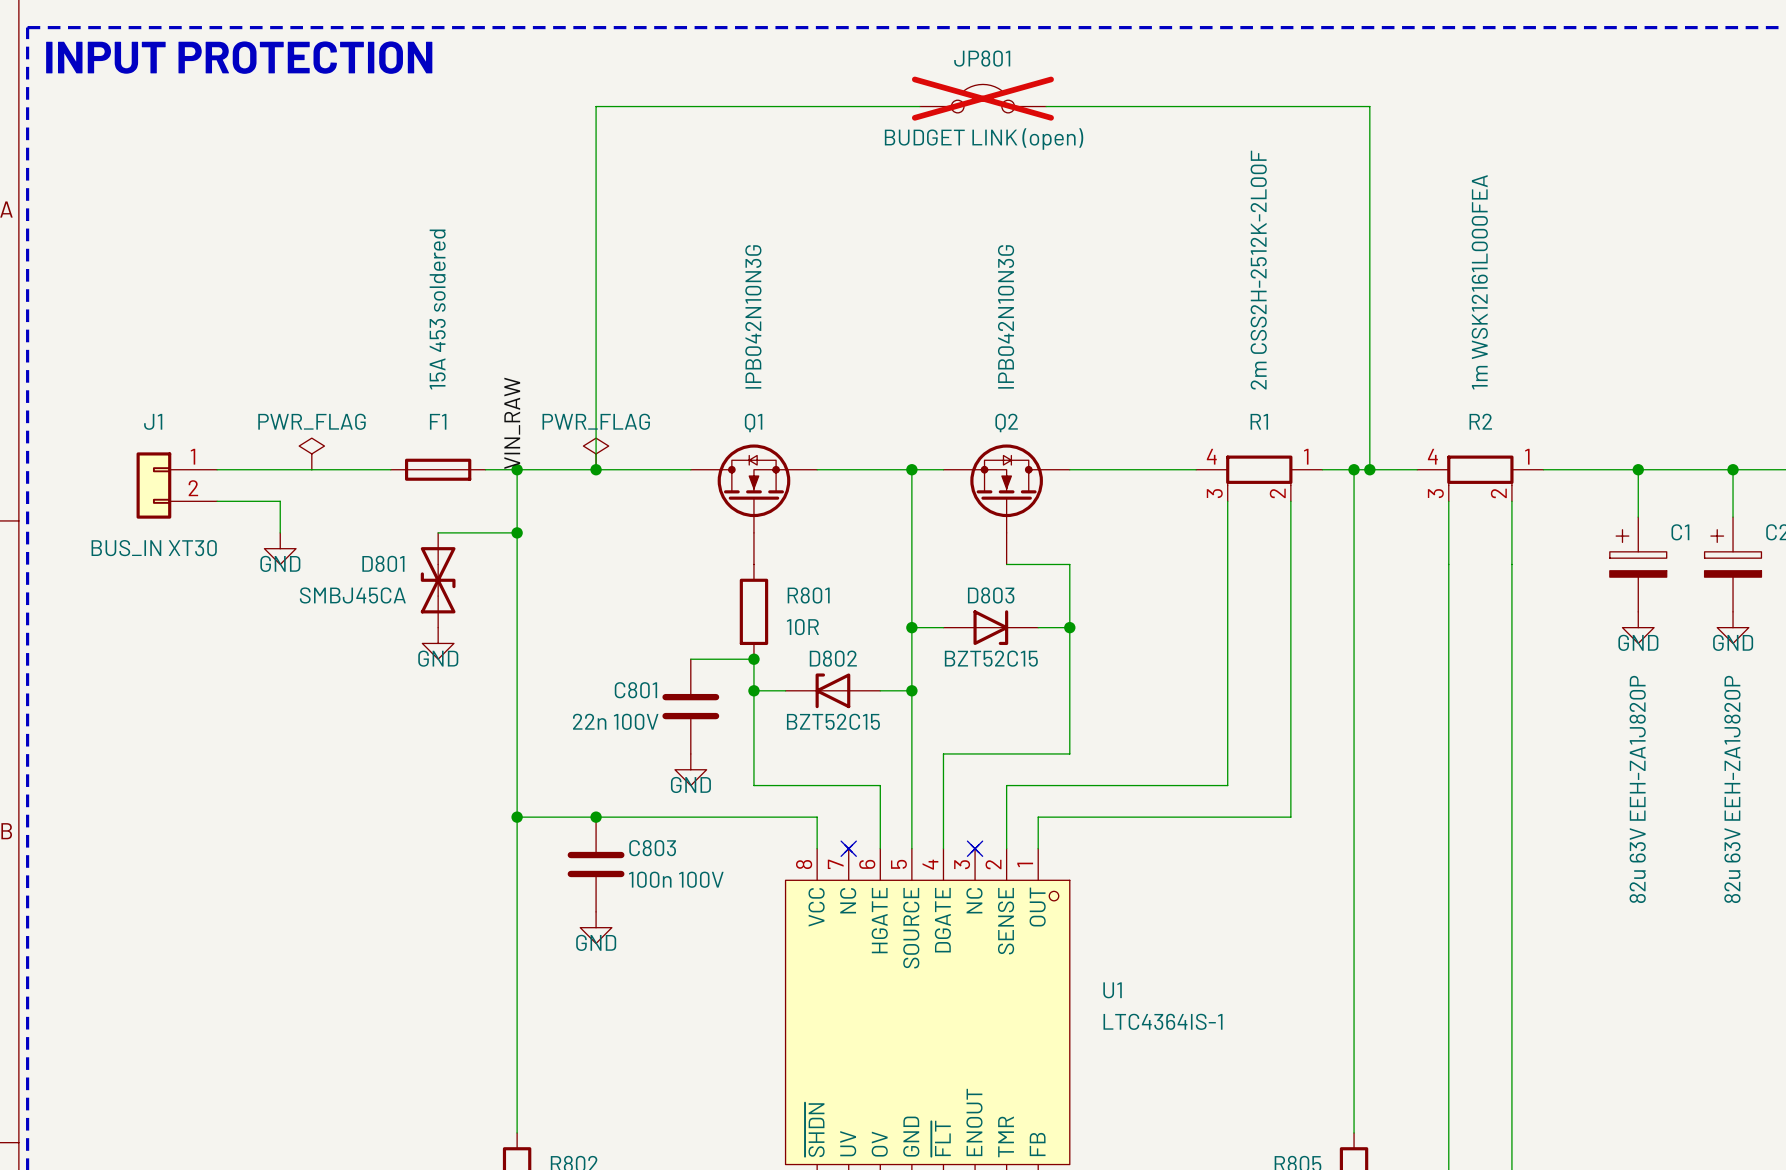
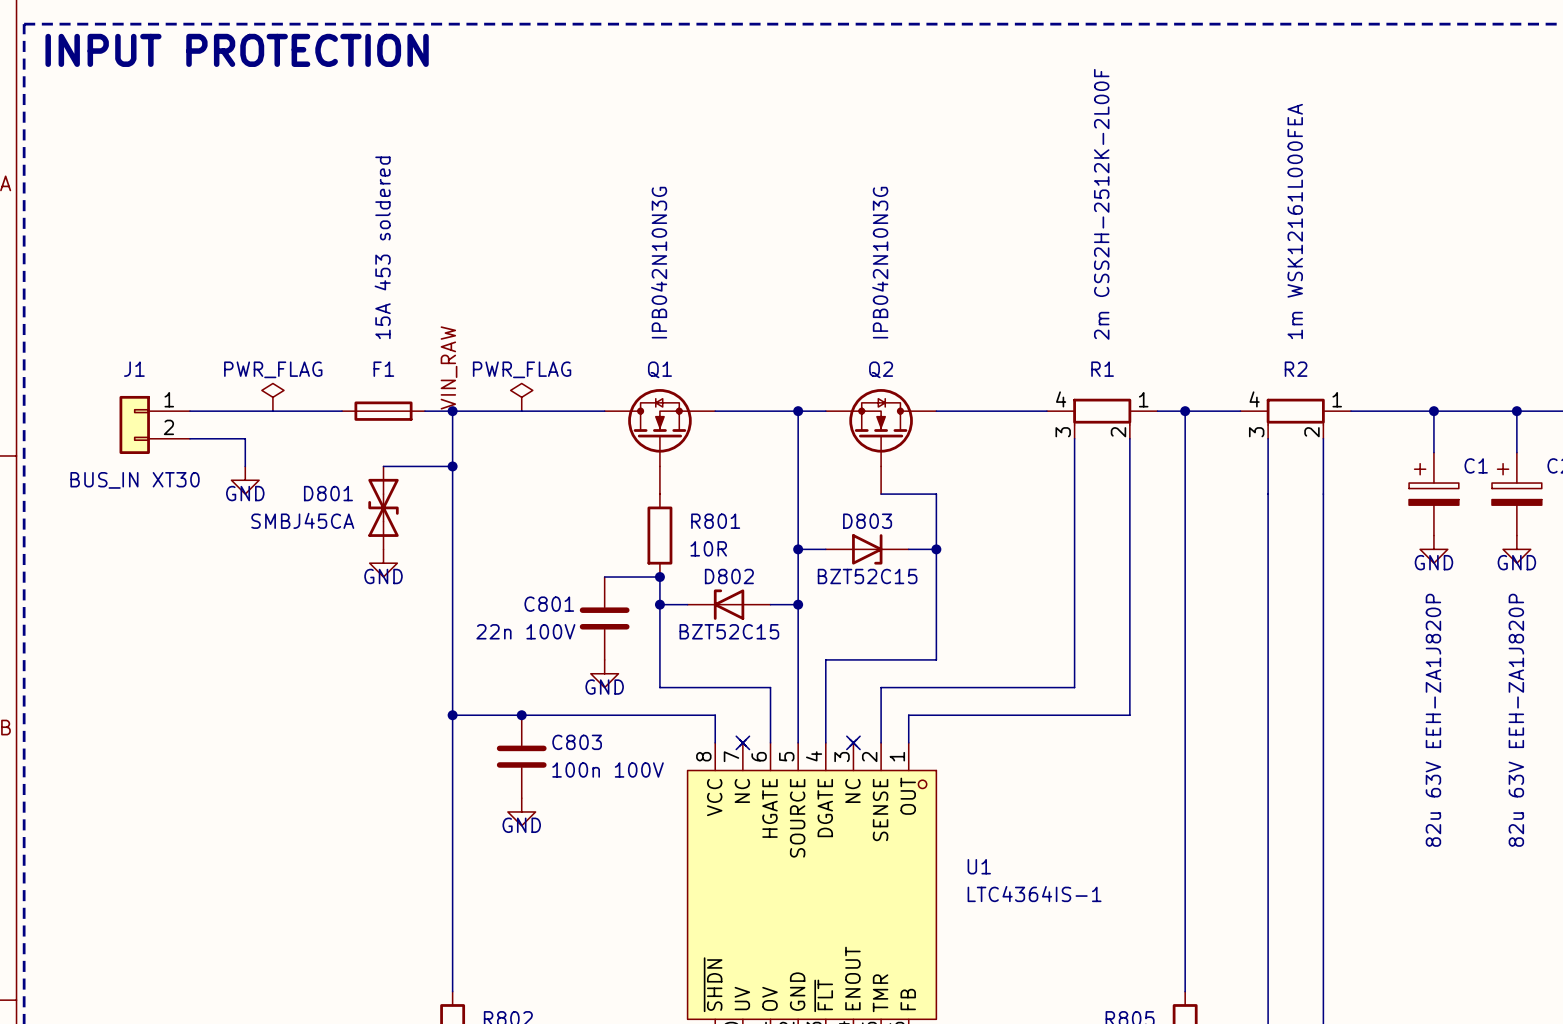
JP801: BUDGET LINK (open) (982, 98) -> none
wire: (919, 106) (596, 106) (596, 469) -> none
wire: (1046, 106) (1369, 106) (1369, 469) -> none
junction: (596, 469) -> none
junction: (1369, 469) -> none

